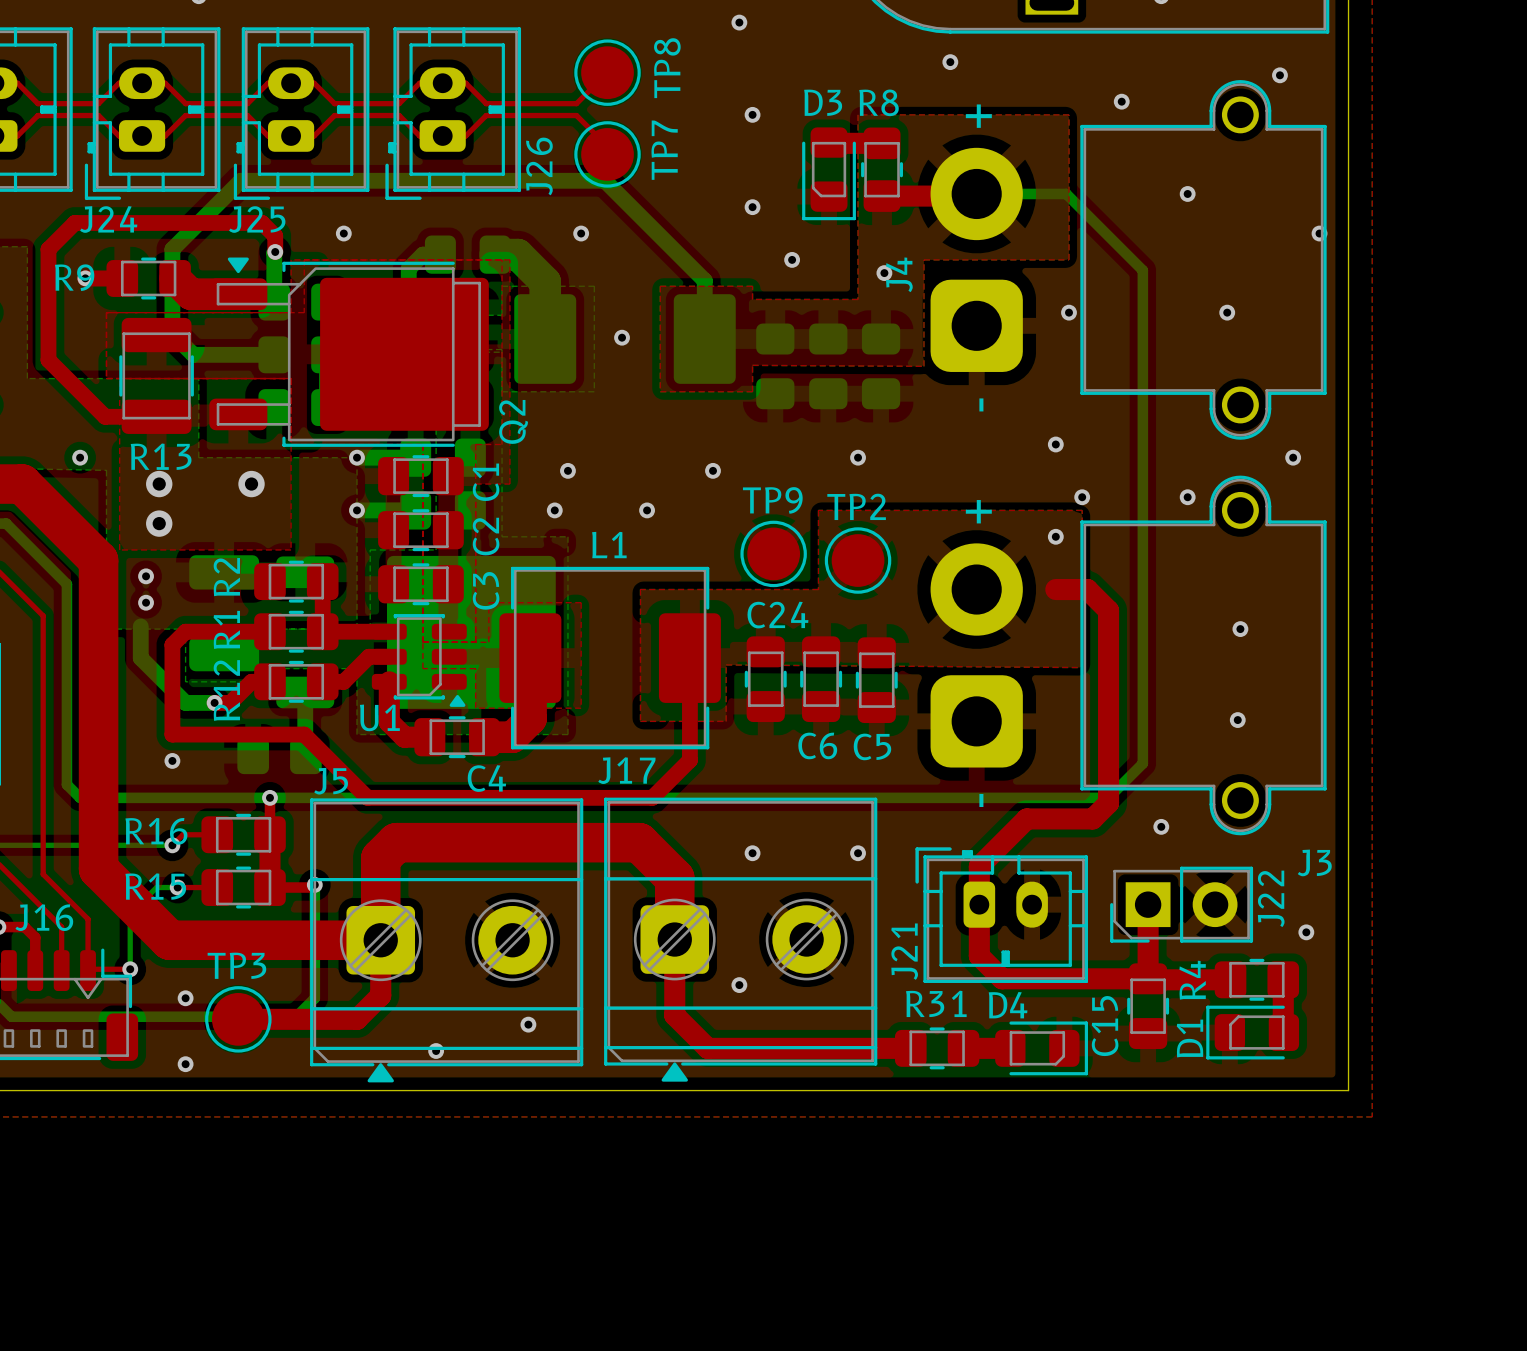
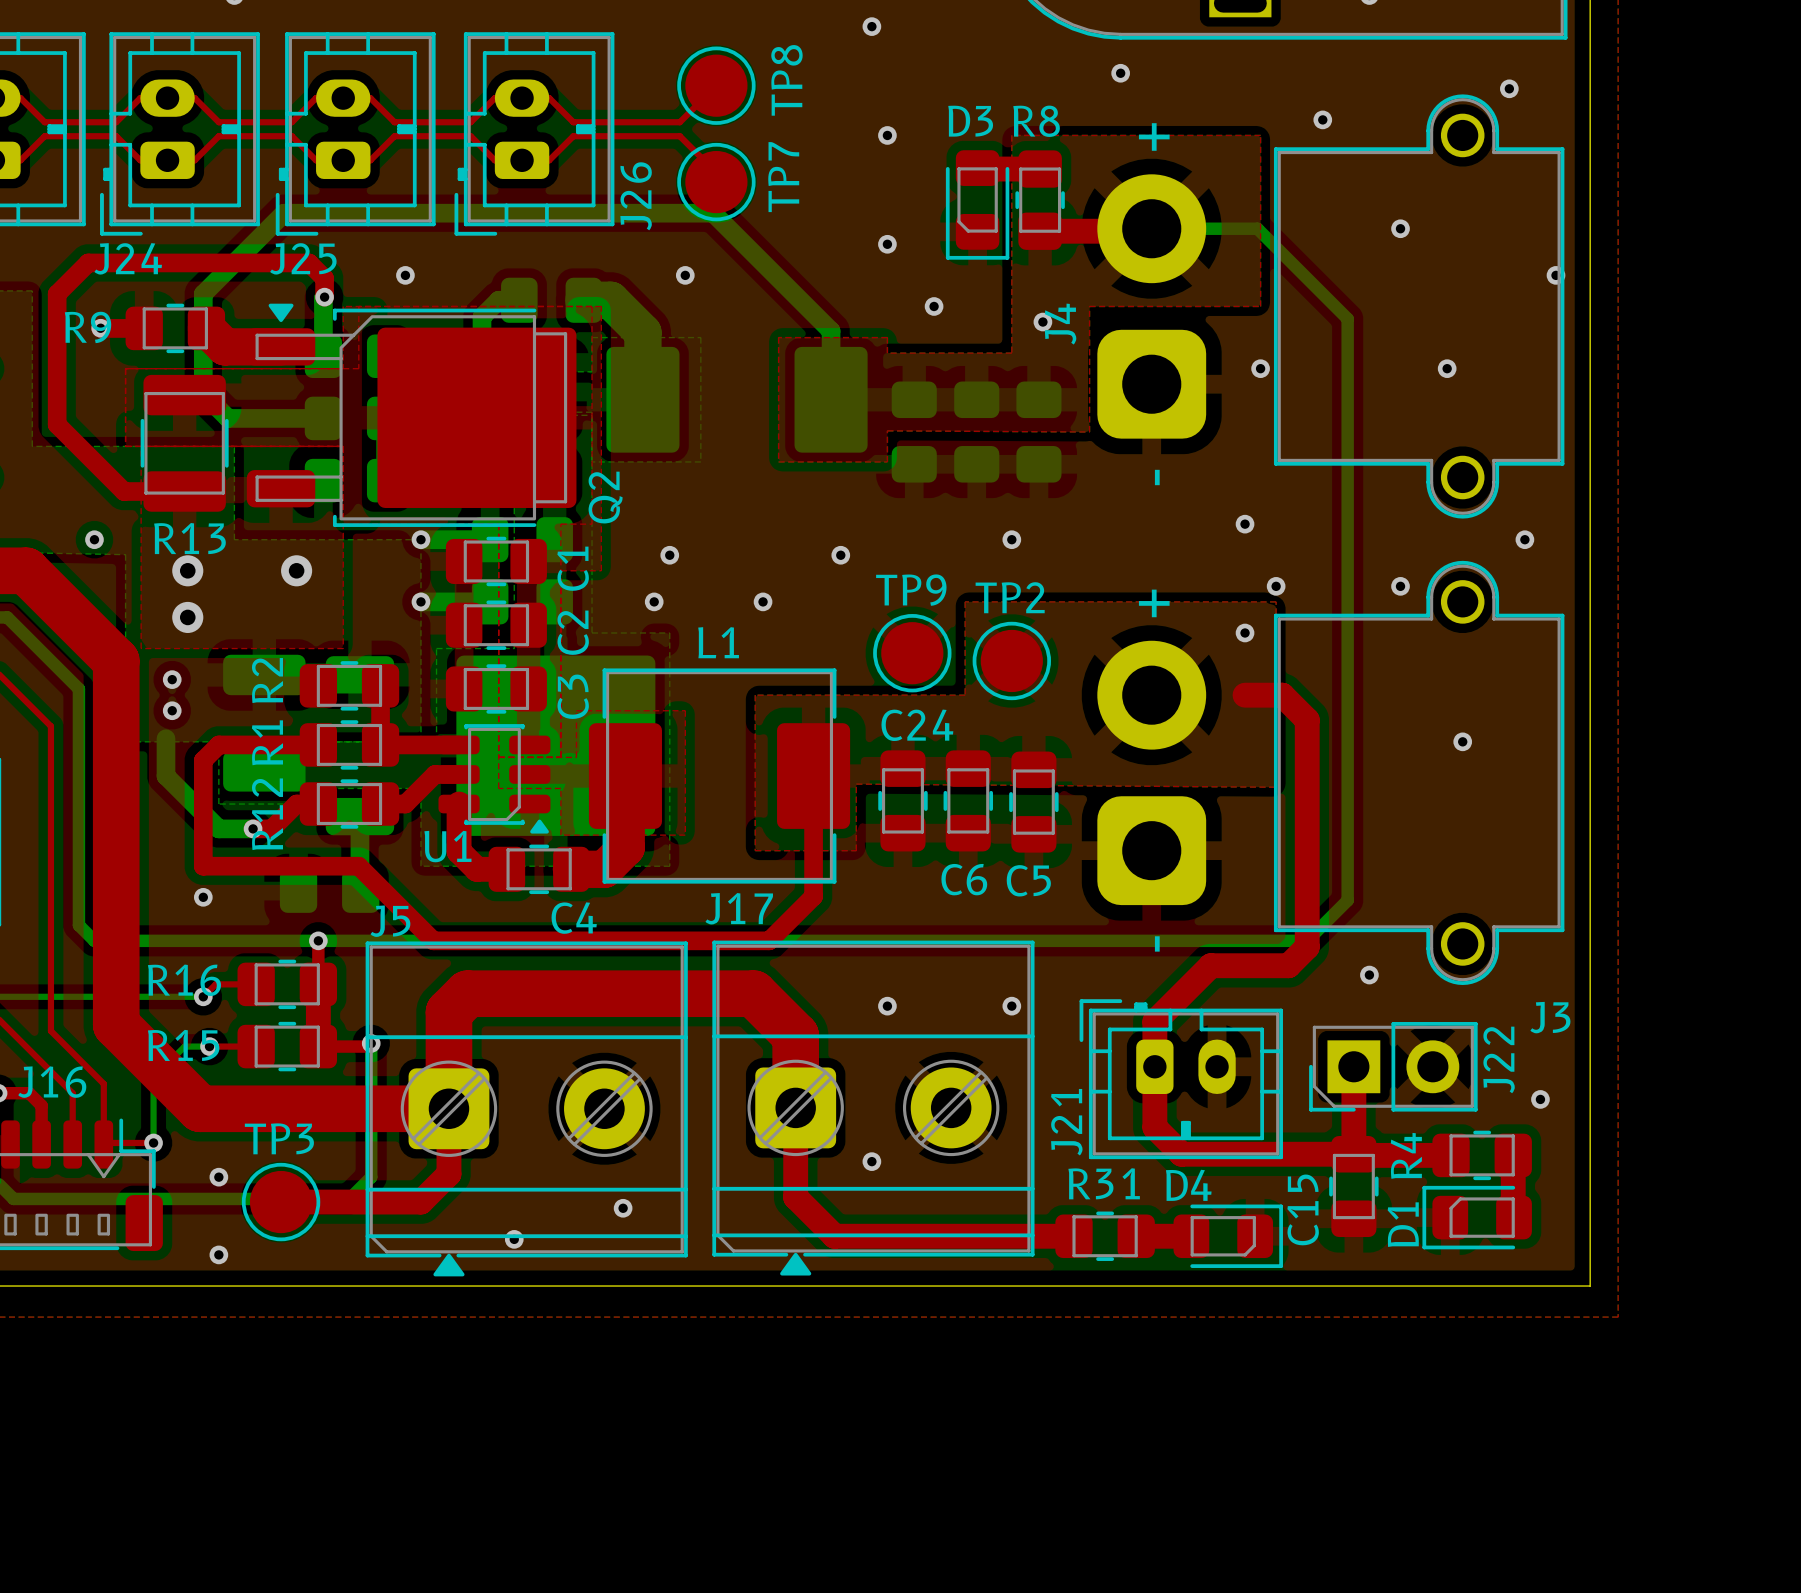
via: (622, 337) -> none
via: (1237, 720) -> none

